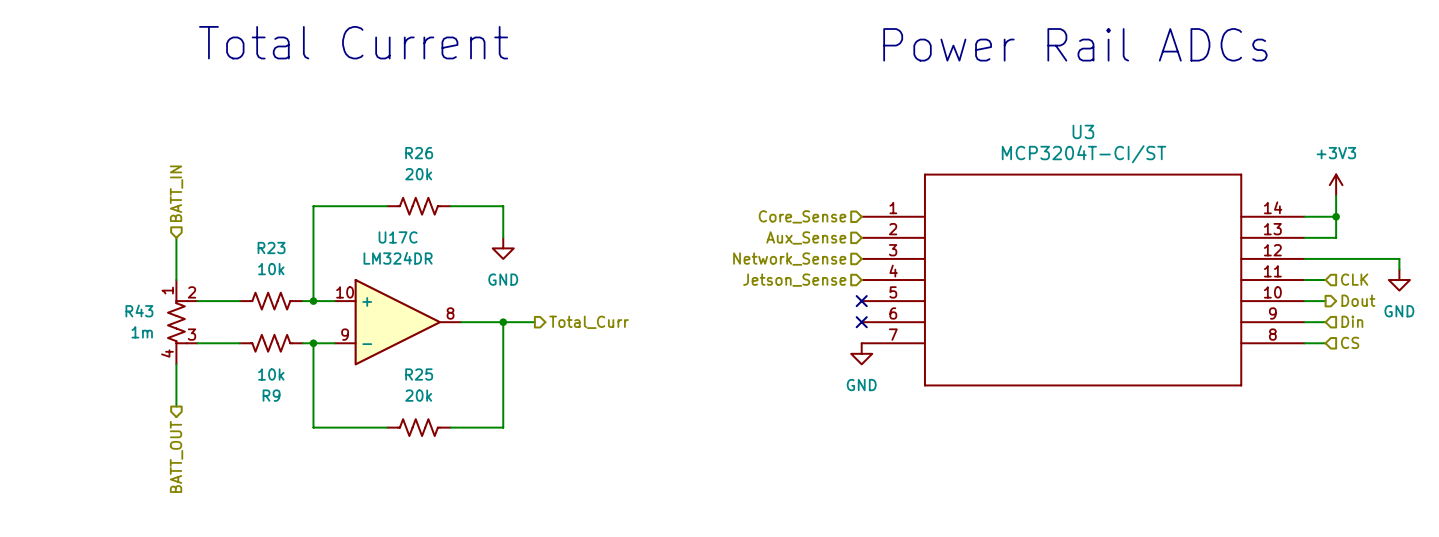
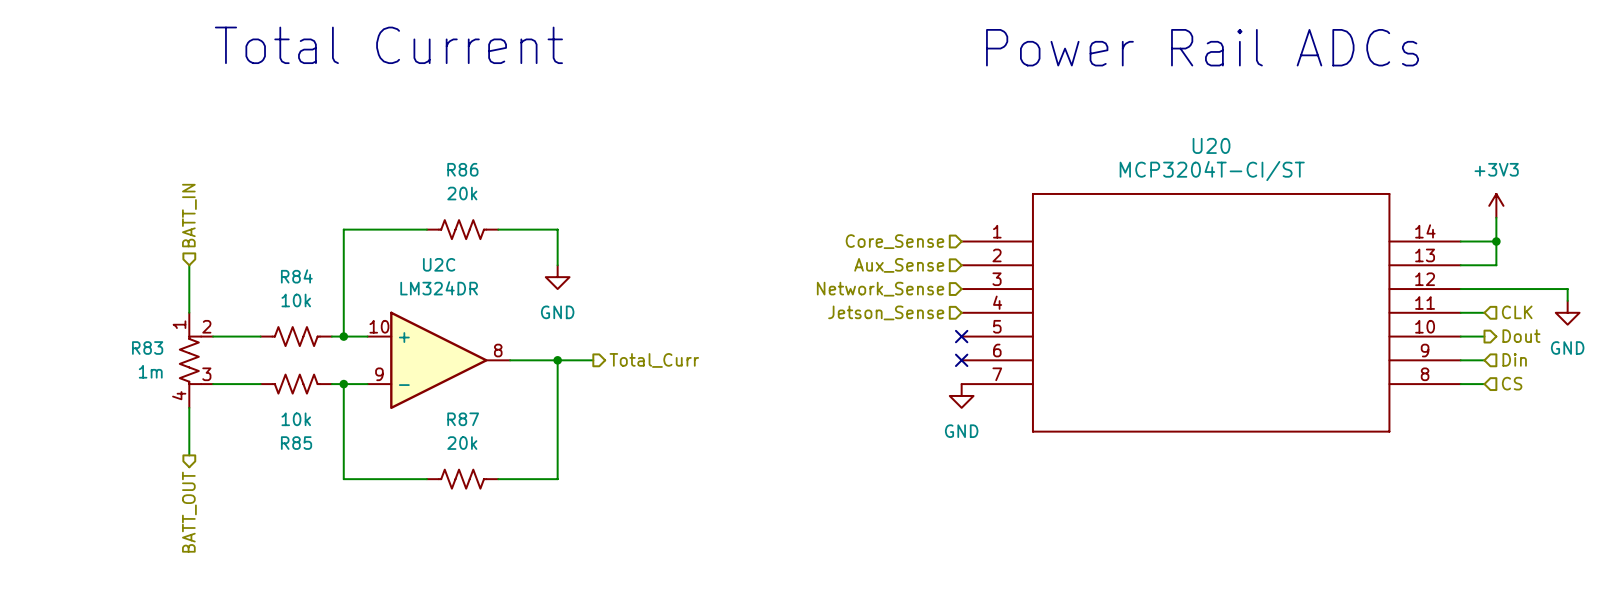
U3 name: U3 (1083, 131) -> U20 (1211, 145)
R26 name: R26 (419, 153) -> R86 (462, 169)
U17C name: U17C (398, 237) -> U2C (439, 264)
R23 name: R23 (271, 247) -> R84 (296, 276)
R43 name: R43 (139, 311) -> R83 (147, 348)
R25 name: R25 (419, 374) -> R87 (463, 419)
R9 name: R9 (271, 395) -> R85 (296, 443)

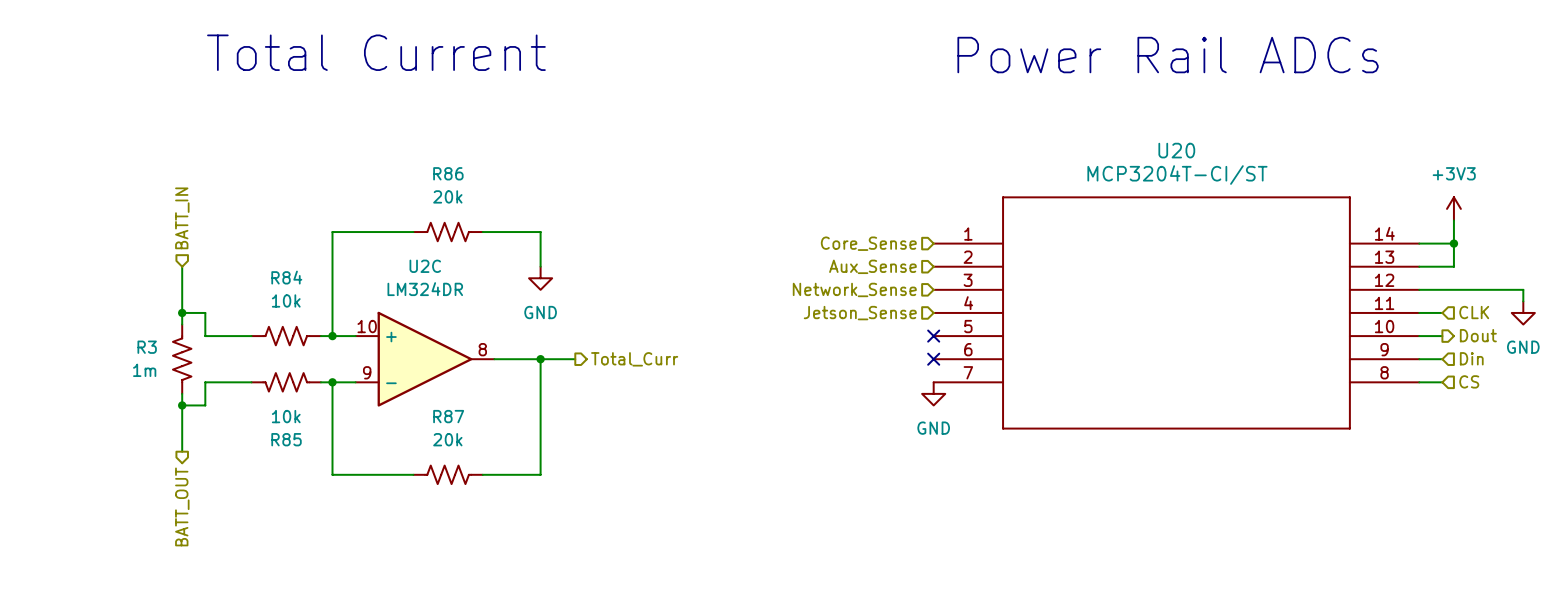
junction: none -> (182, 312)
wire: none -> (182, 324) (182, 312) (205, 312) (205, 336)
R3: none -> 1m (182, 359)
R83: 1m (196, 360) -> none
wire: none -> (205, 382) (205, 405) (182, 405) (182, 393)
junction: none -> (182, 405)

